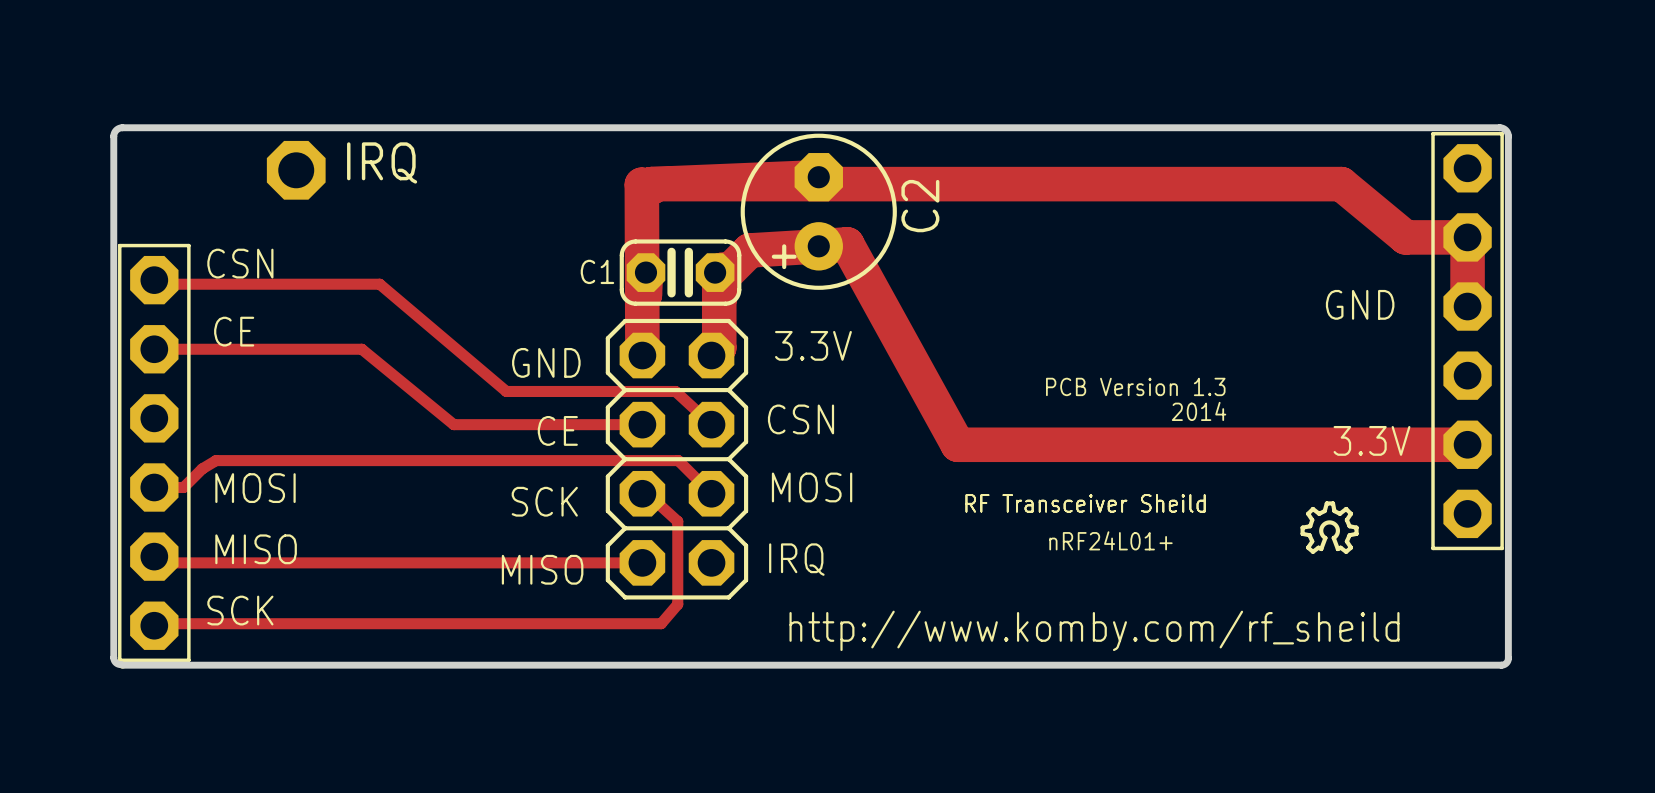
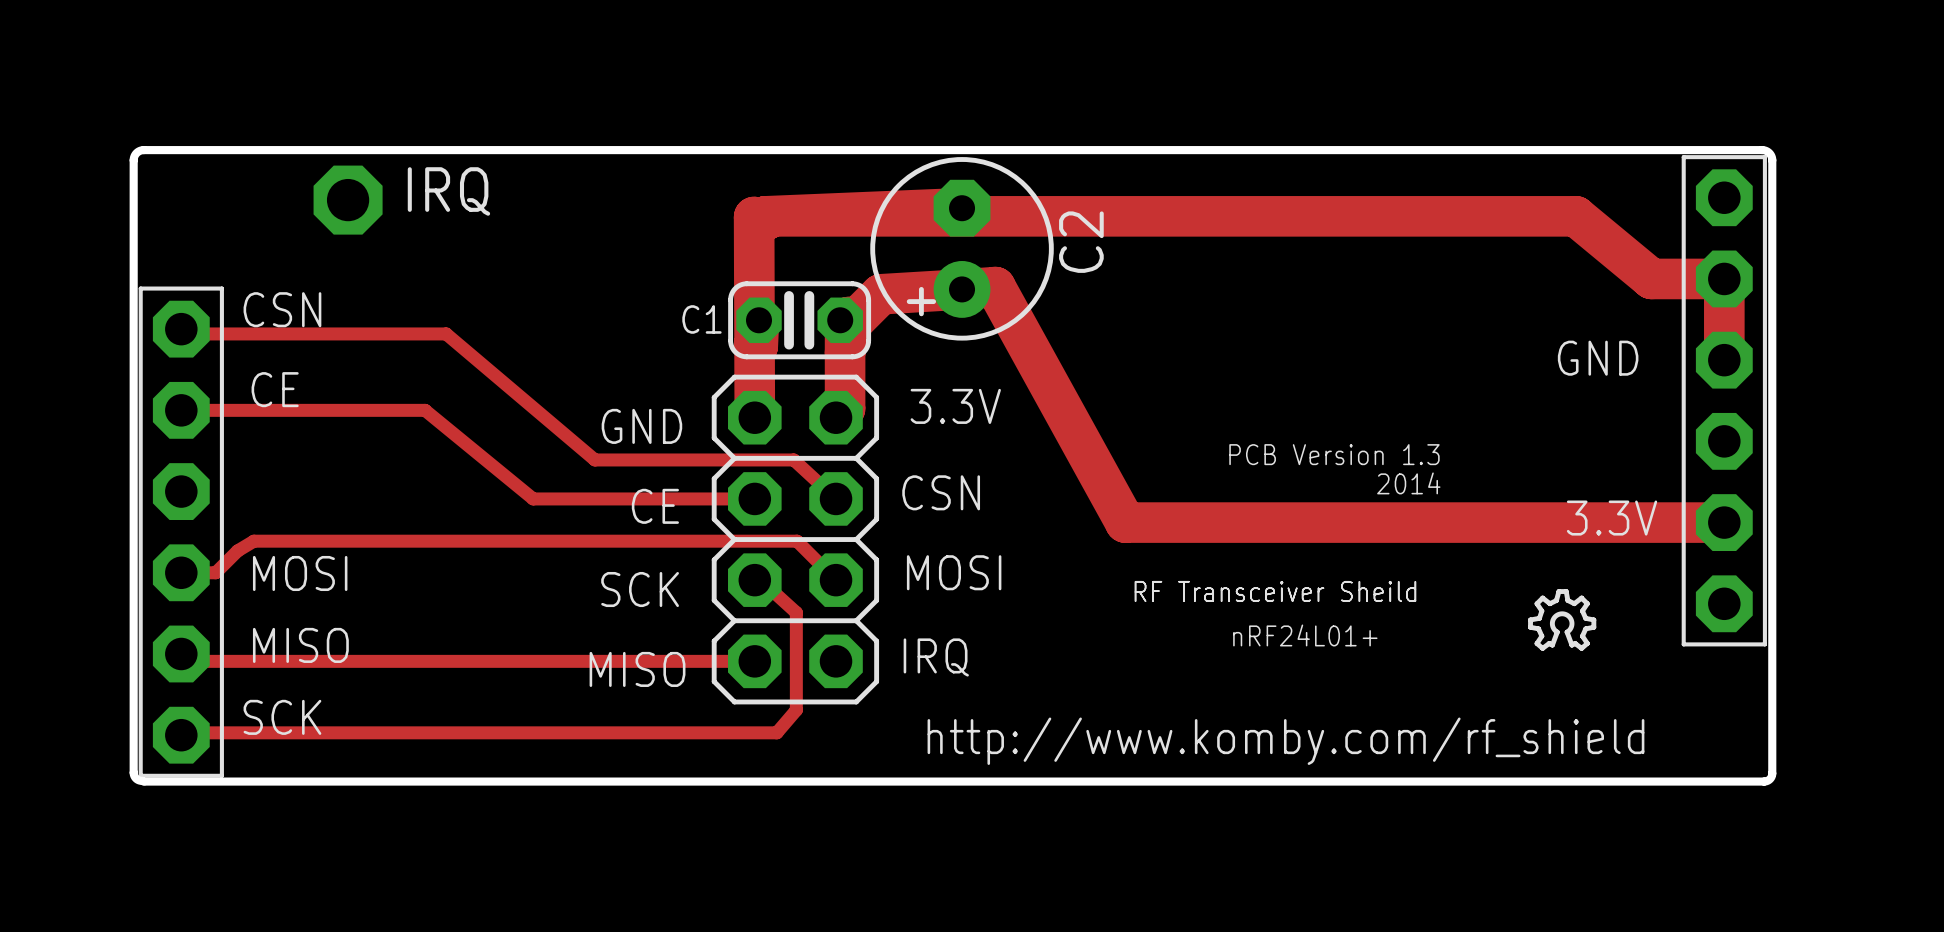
text: http://www.komby.com/rf_sheild (1094, 630) -> http://www.komby.com/rf_shield (1285, 741)

